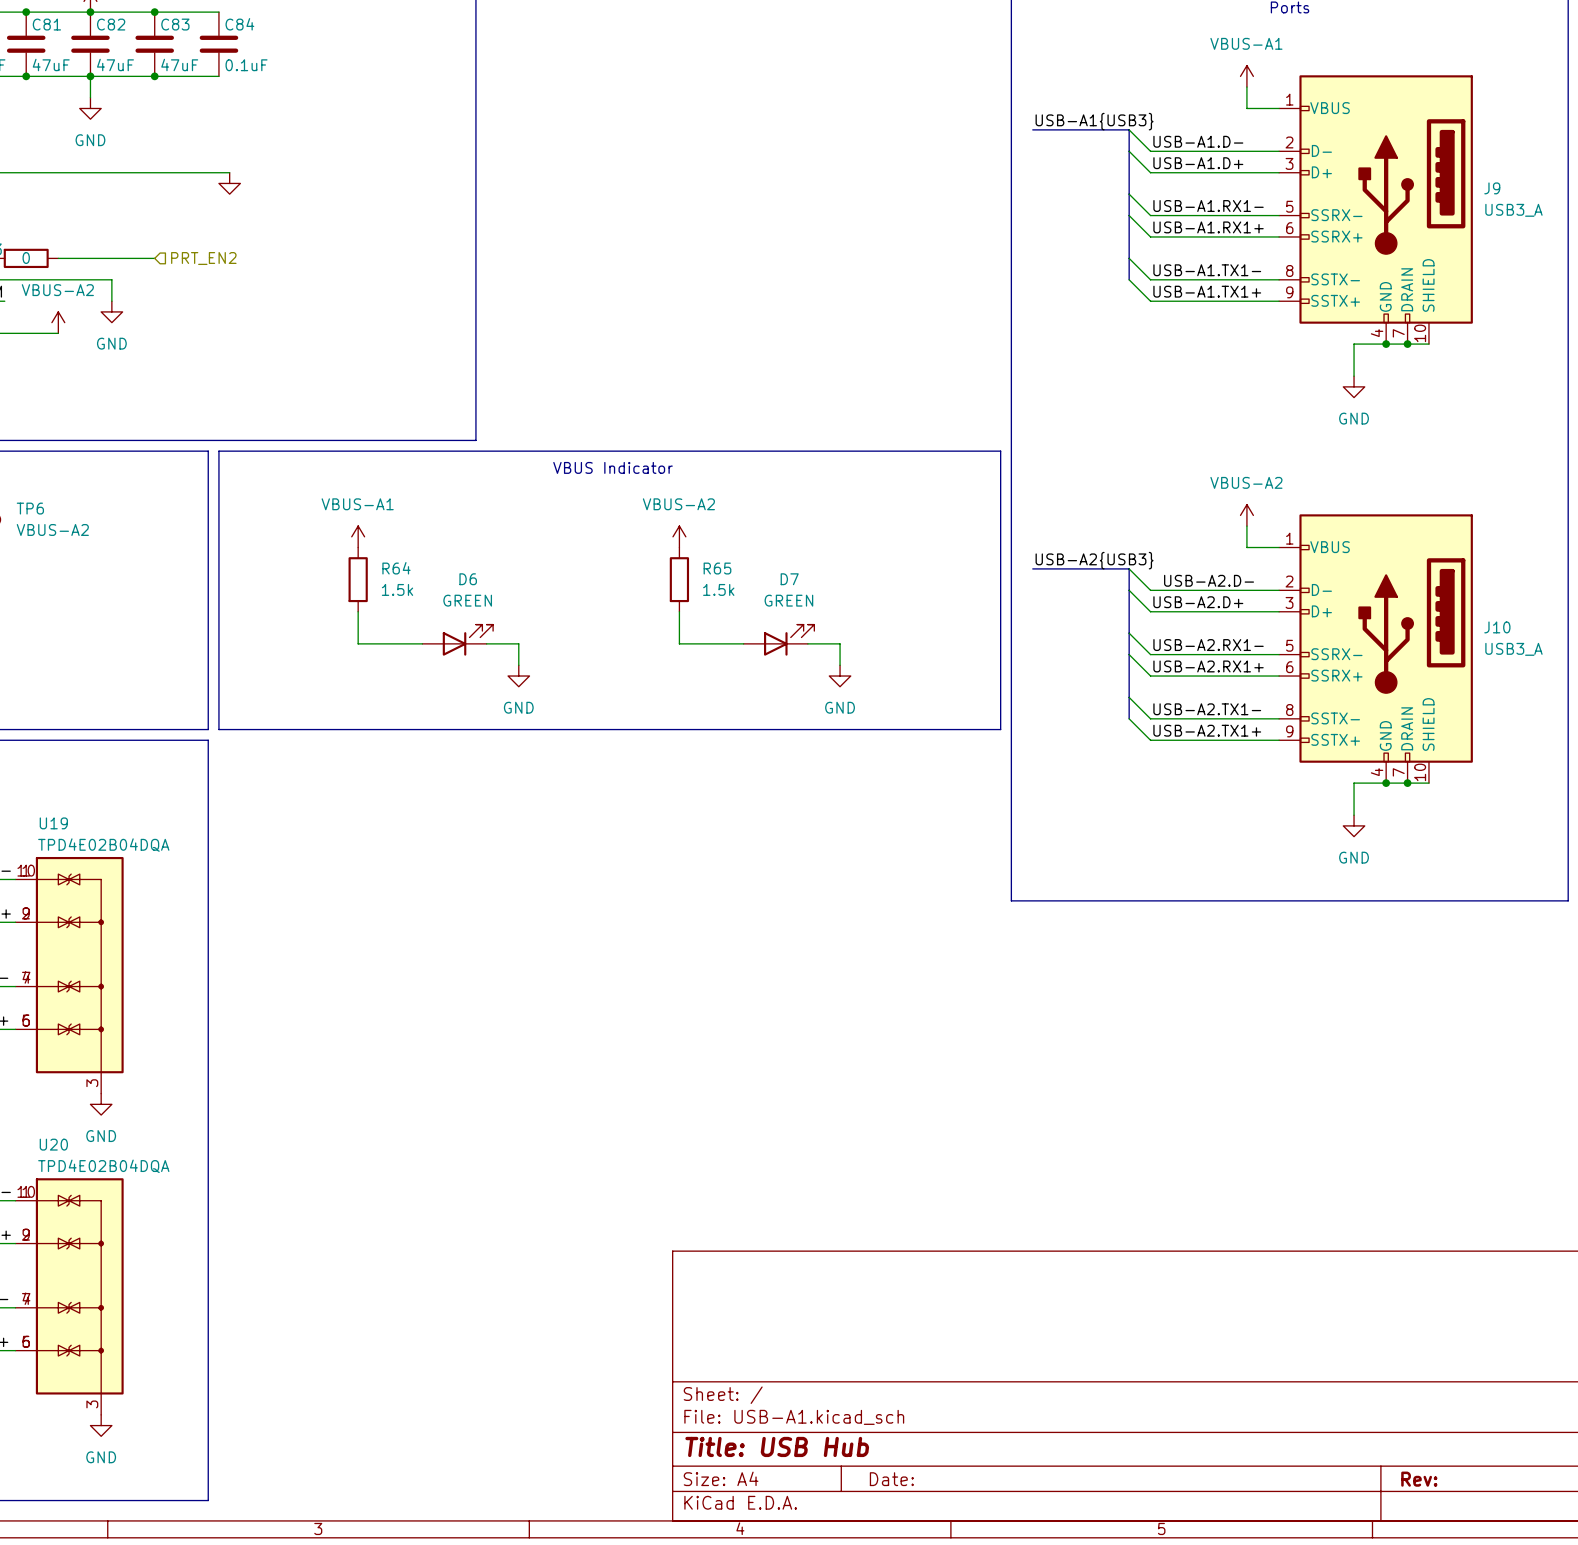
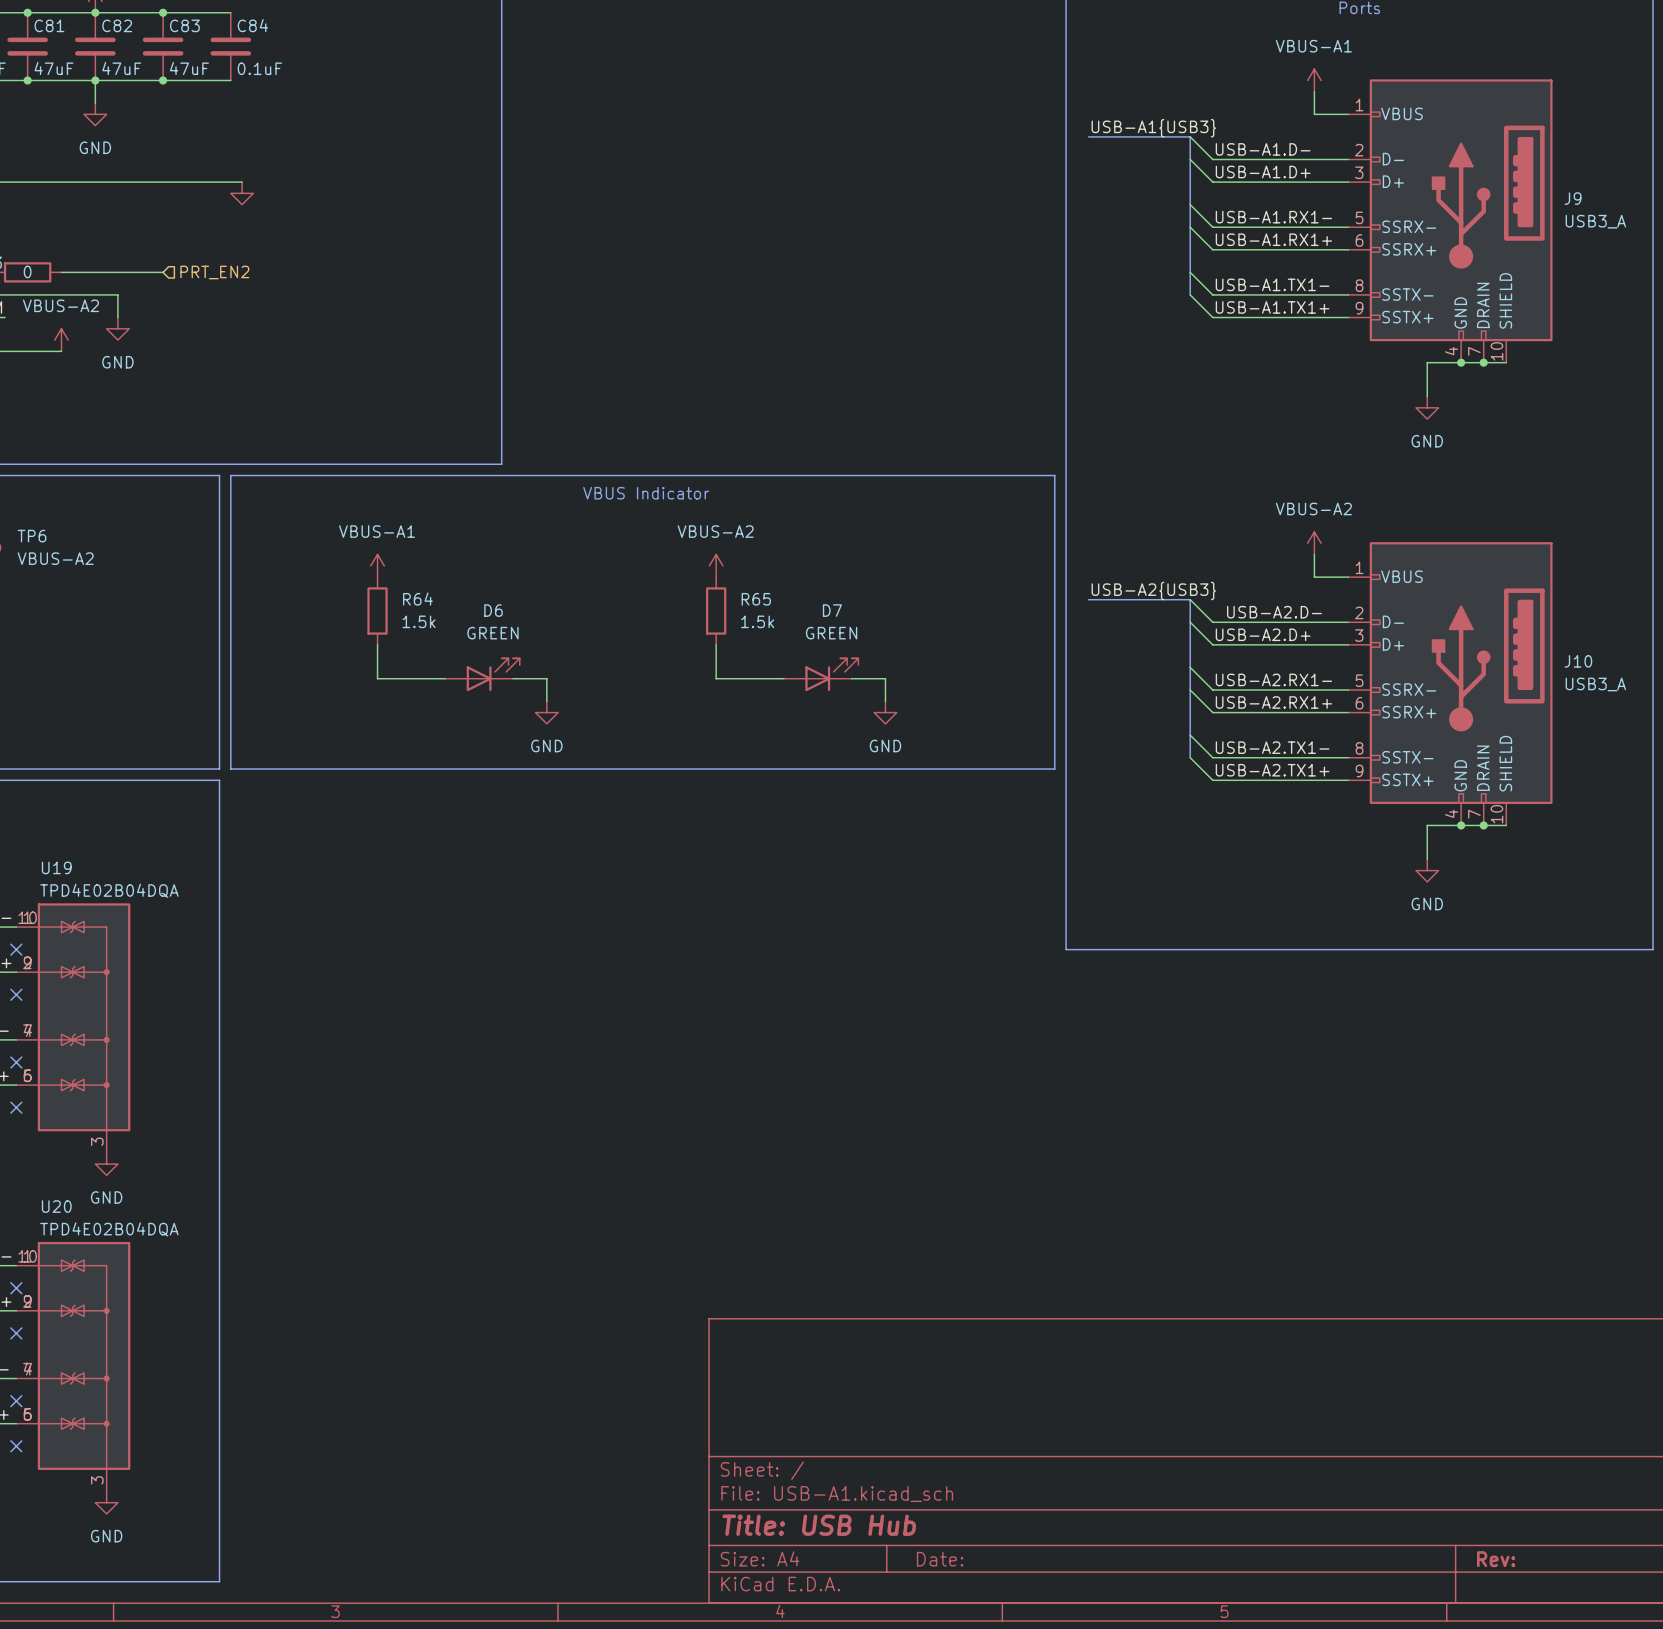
no-connect mark: none -> (16, 949)
no-connect mark: none -> (16, 994)
no-connect mark: none -> (16, 1062)
no-connect mark: none -> (16, 1107)
no-connect mark: none -> (16, 1288)
no-connect mark: none -> (16, 1333)
no-connect mark: none -> (16, 1401)
no-connect mark: none -> (16, 1446)

